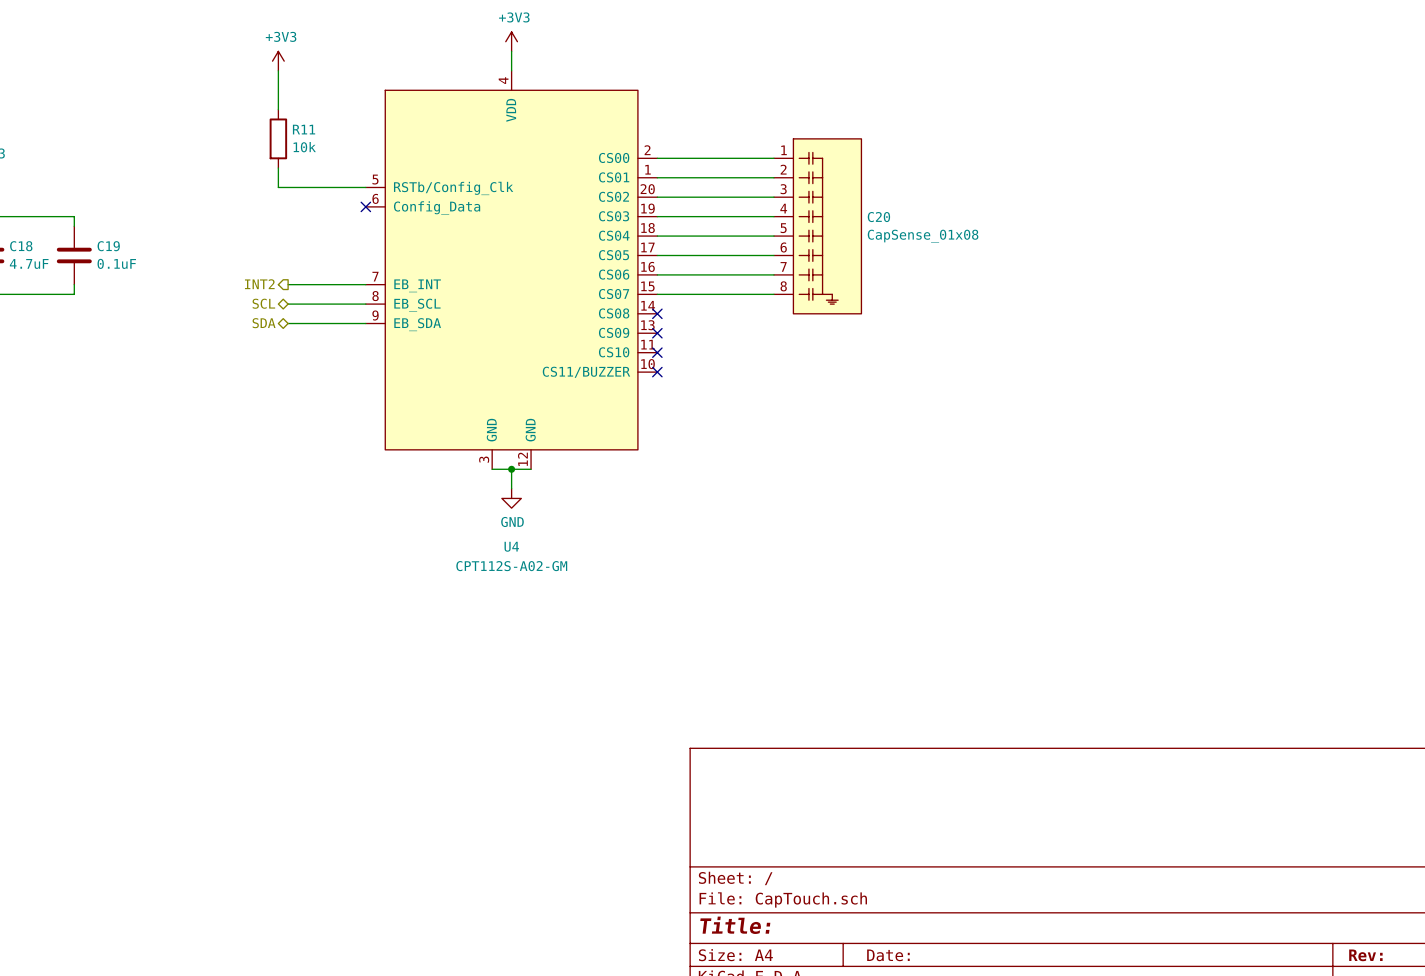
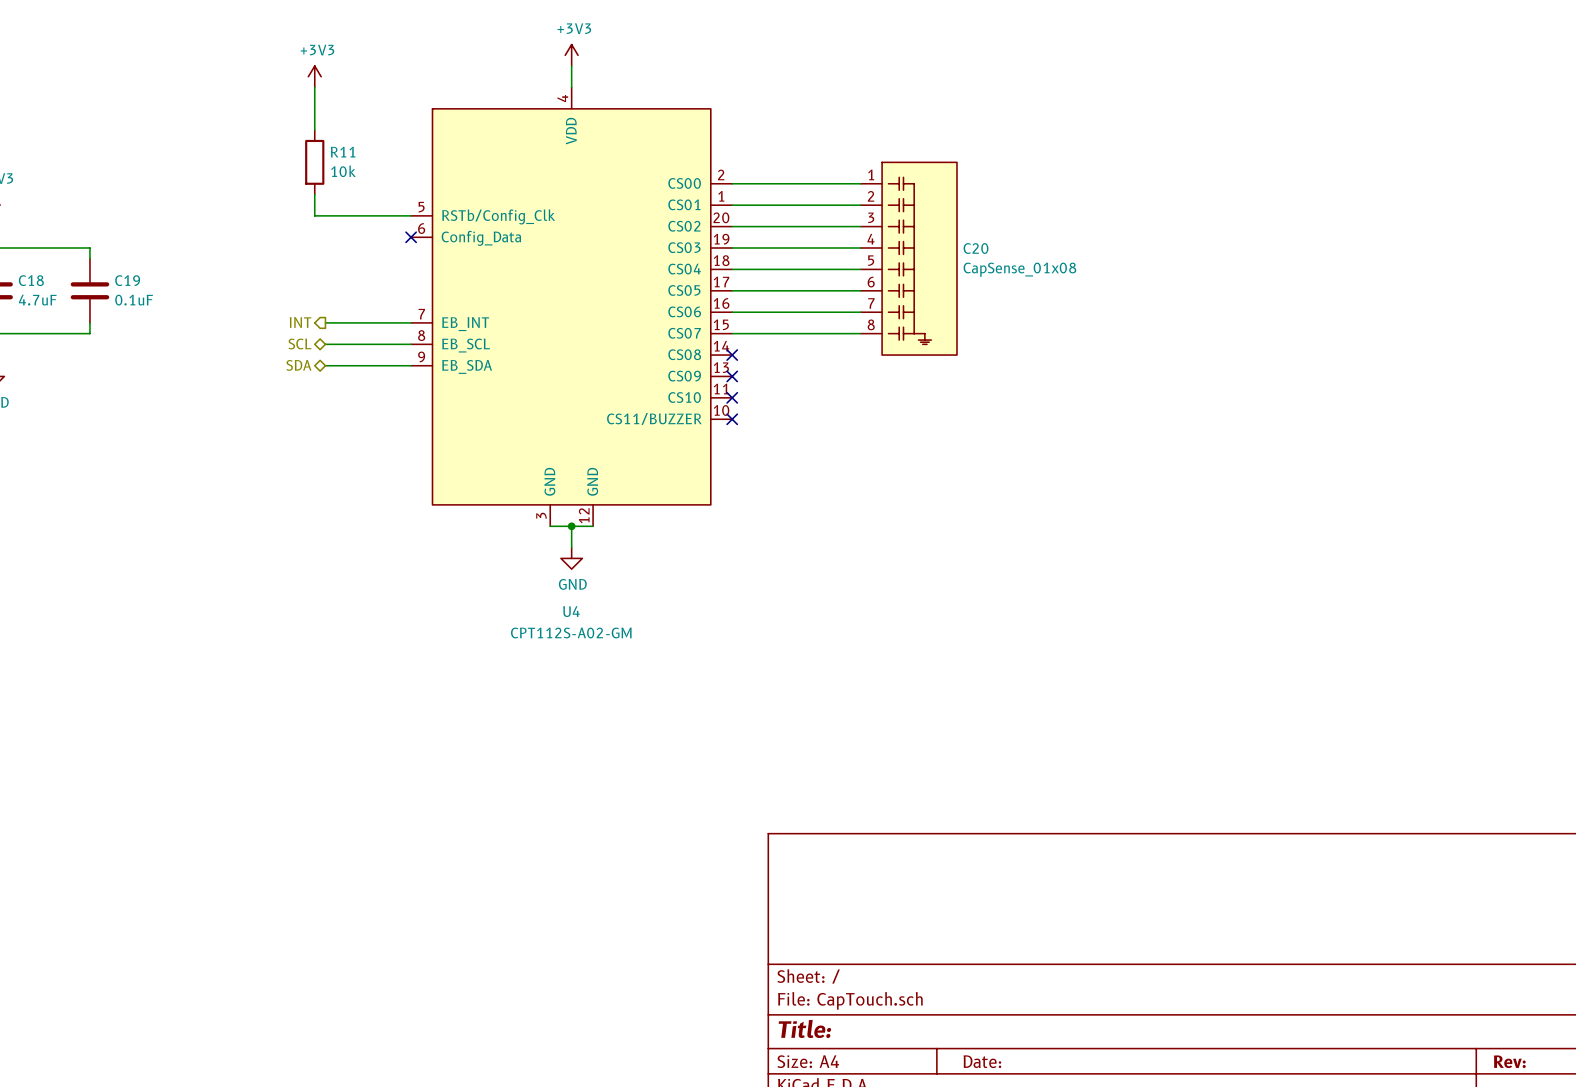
hierarchical label: INT2 (259, 284) -> INT (300, 322)

